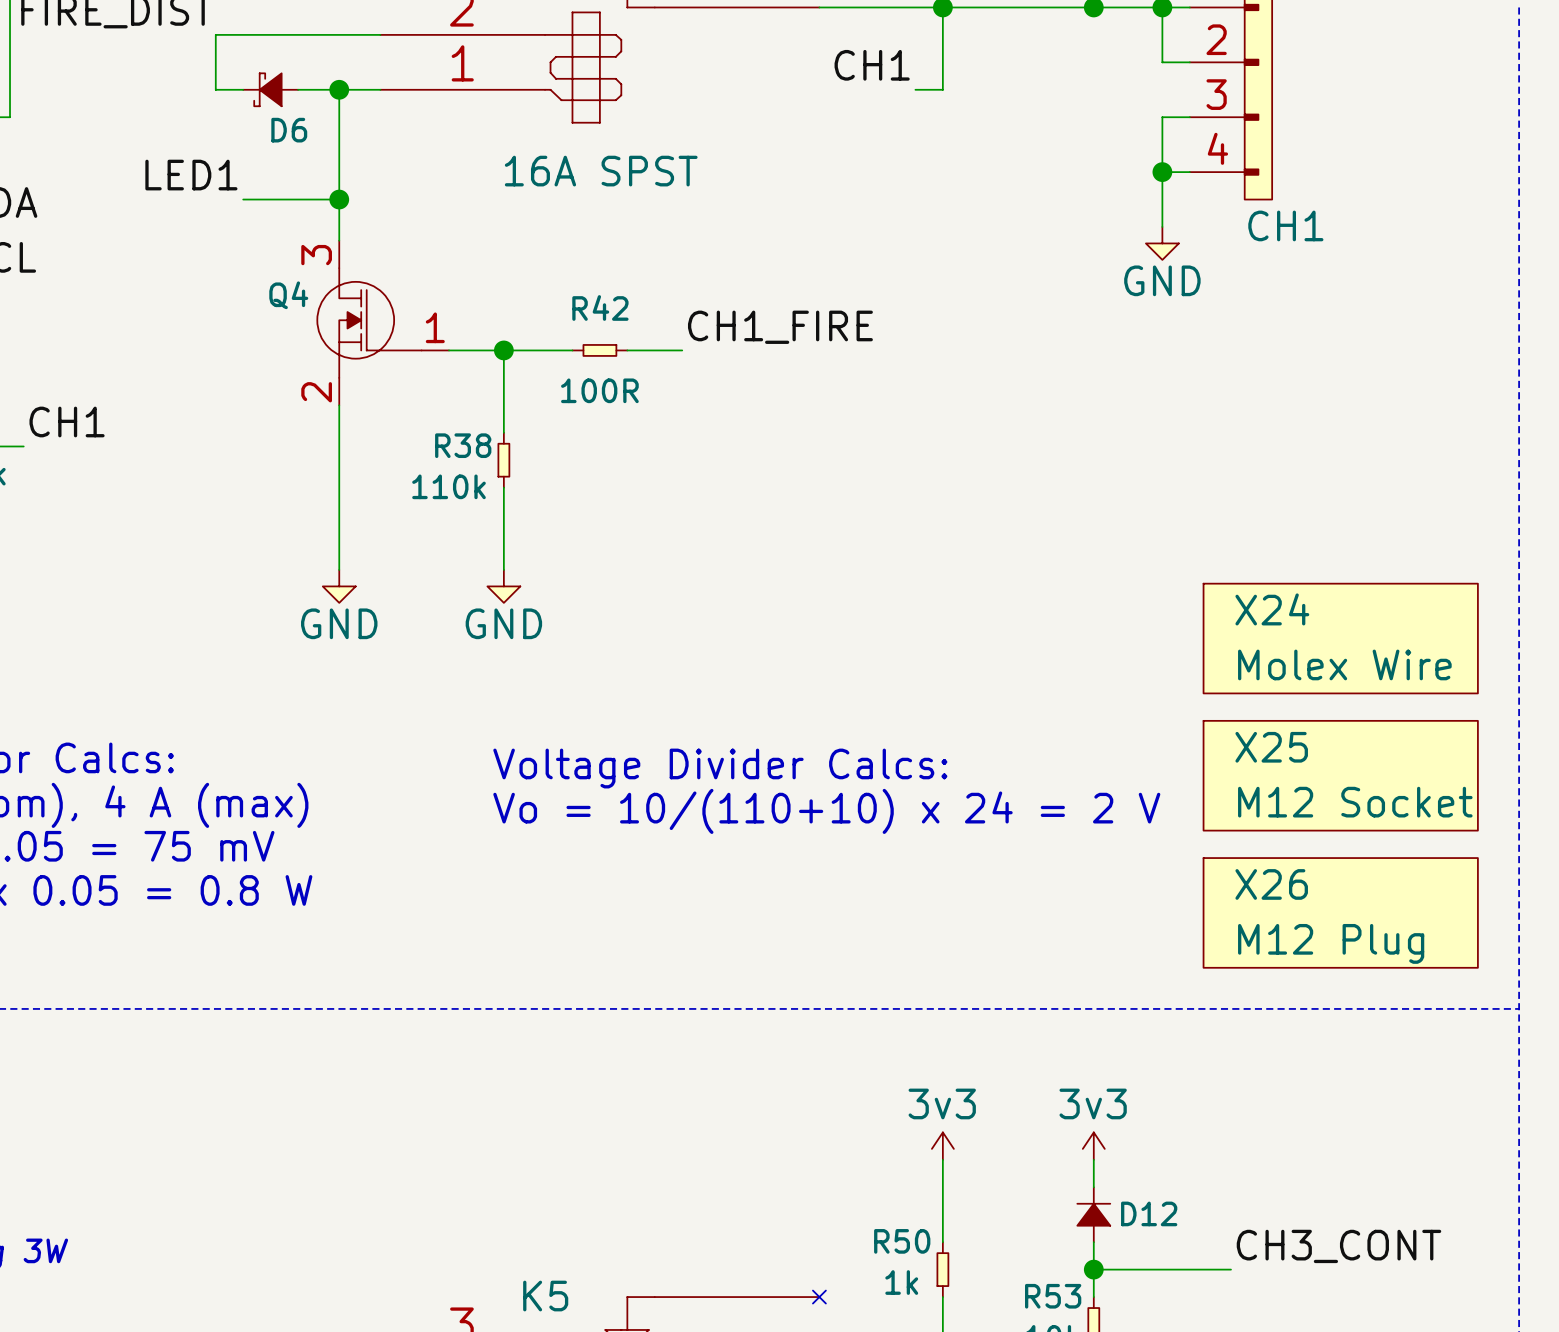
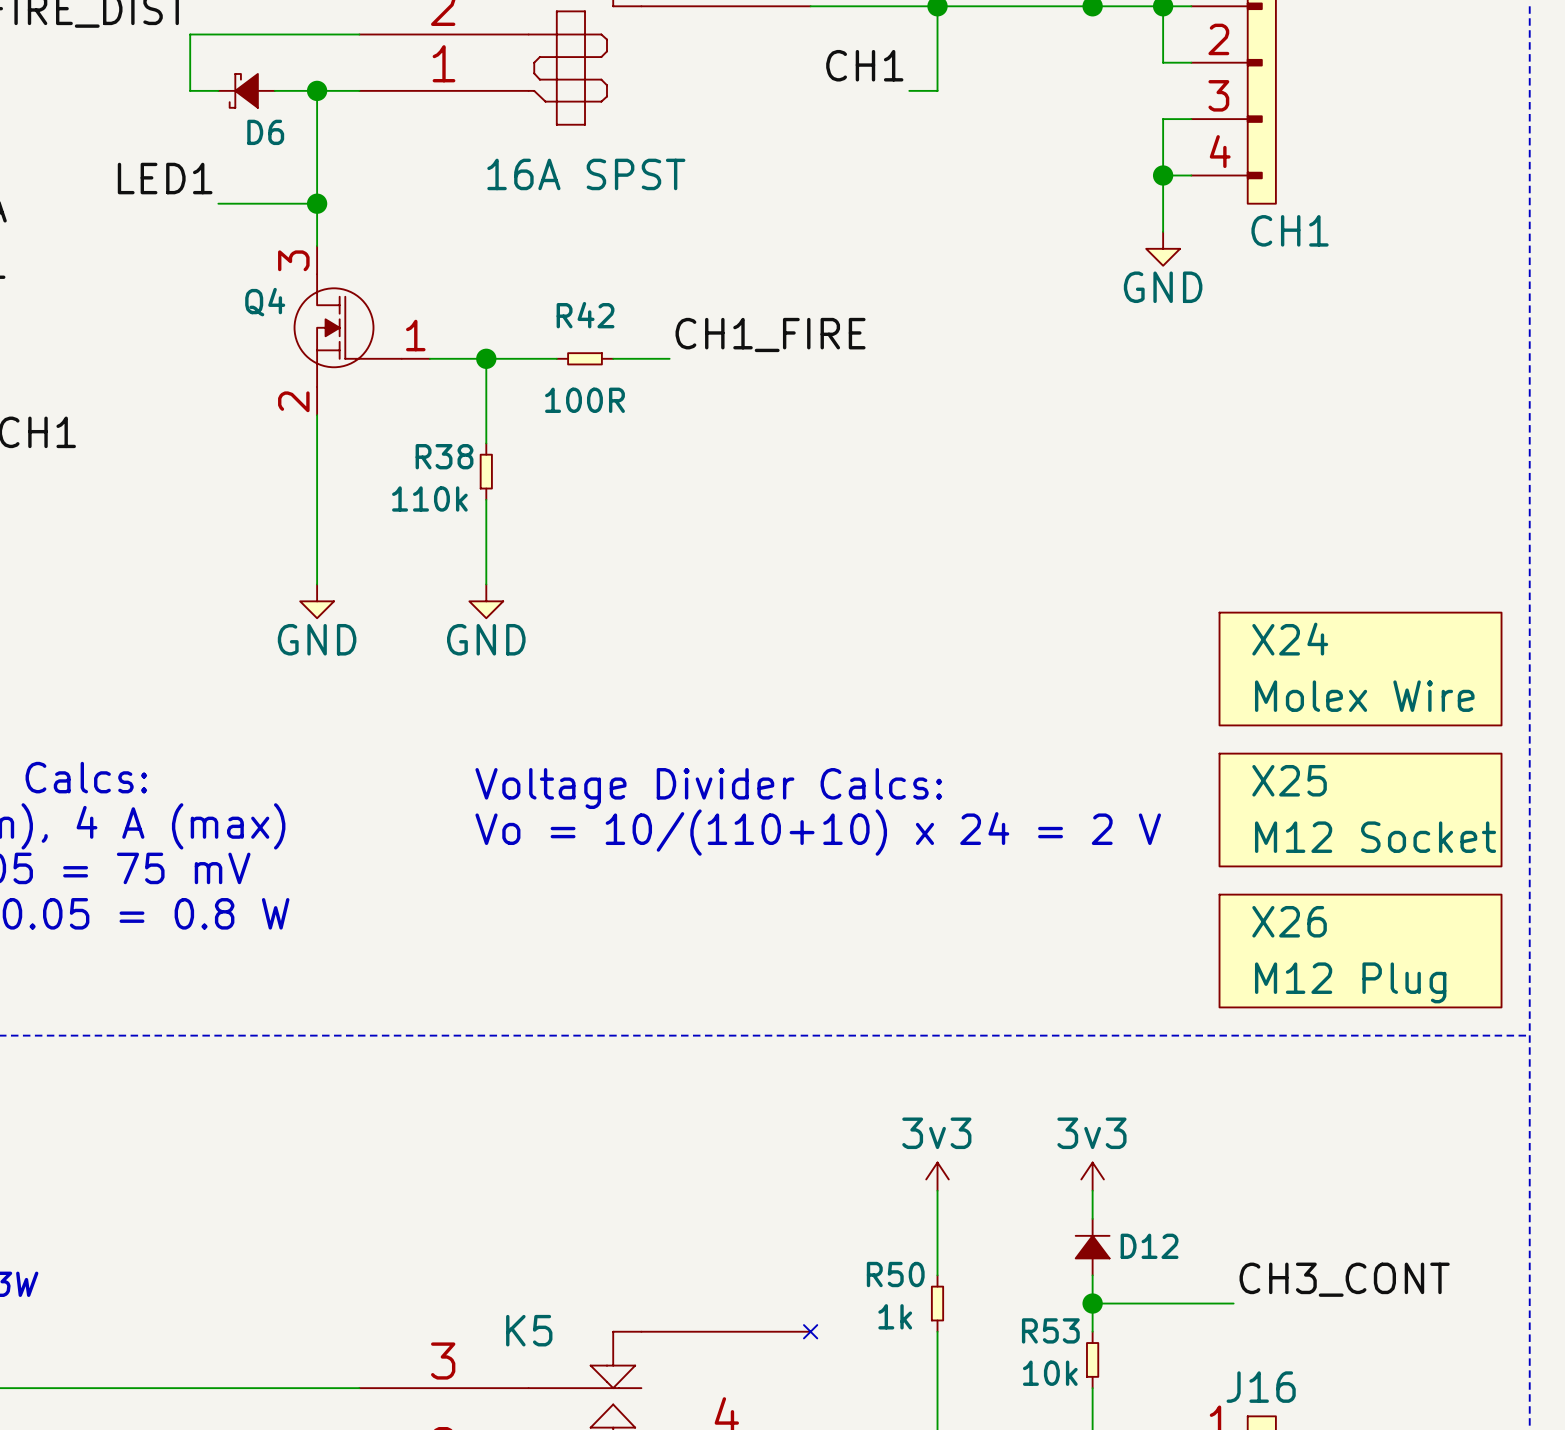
X24 position: (1340, 638) -> (1360, 669)
X25 position: (1340, 775) -> (1360, 810)
X26 position: (1340, 912) -> (1360, 951)

